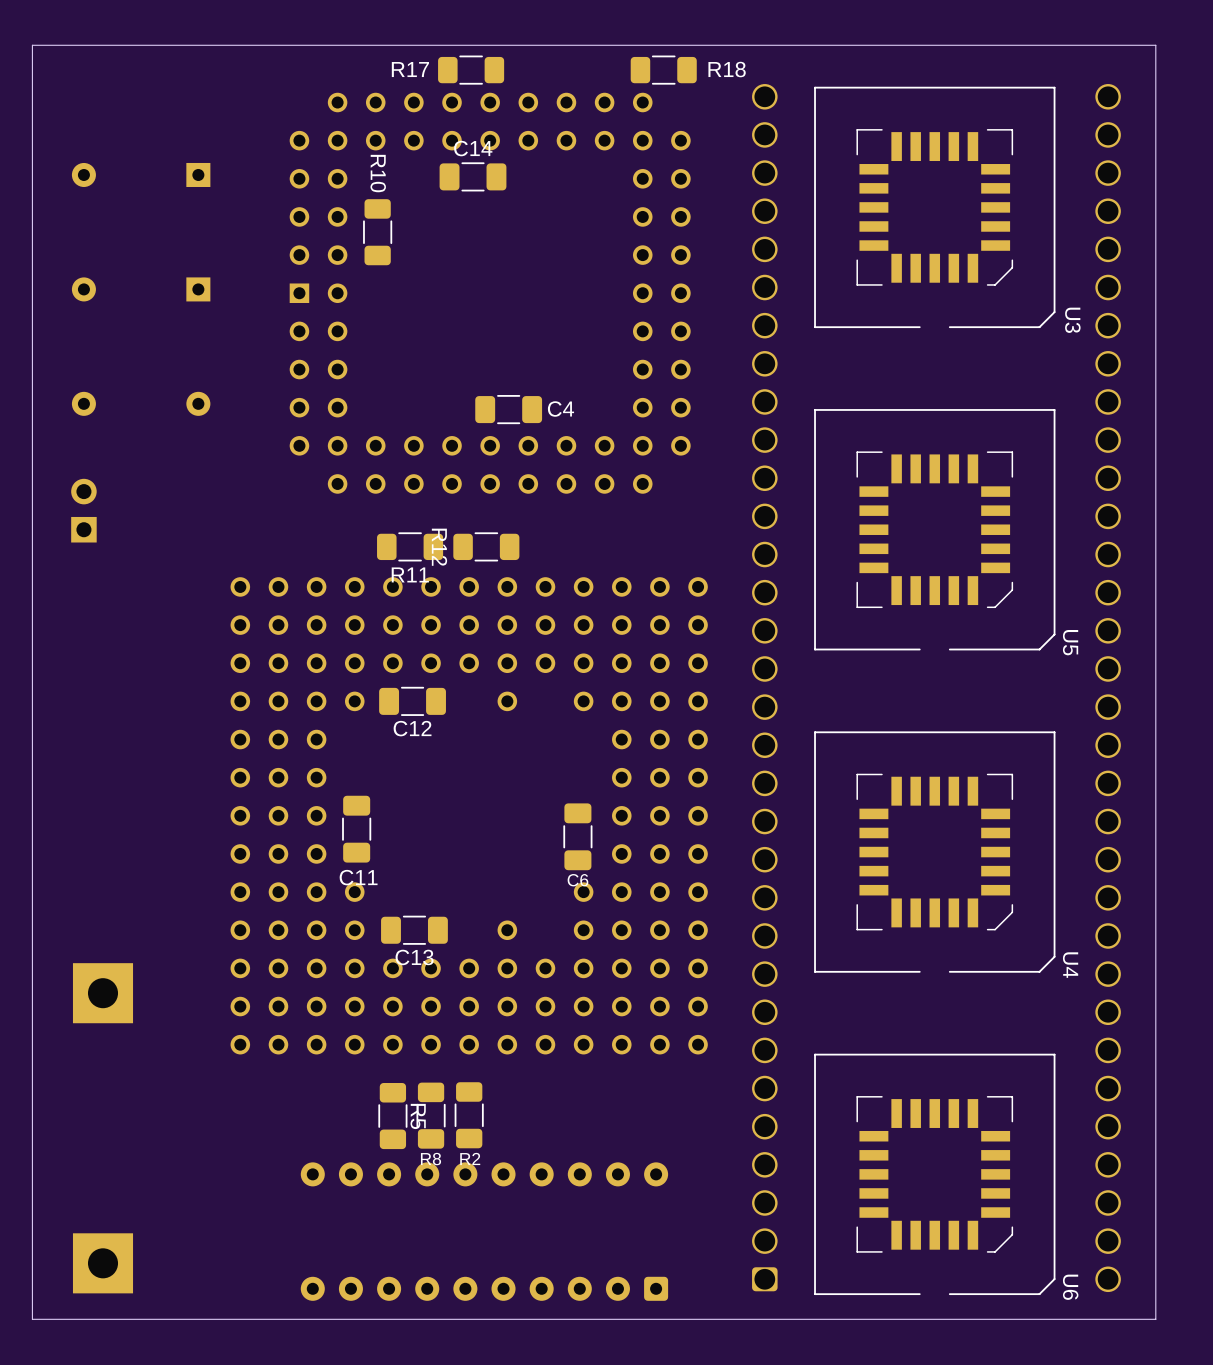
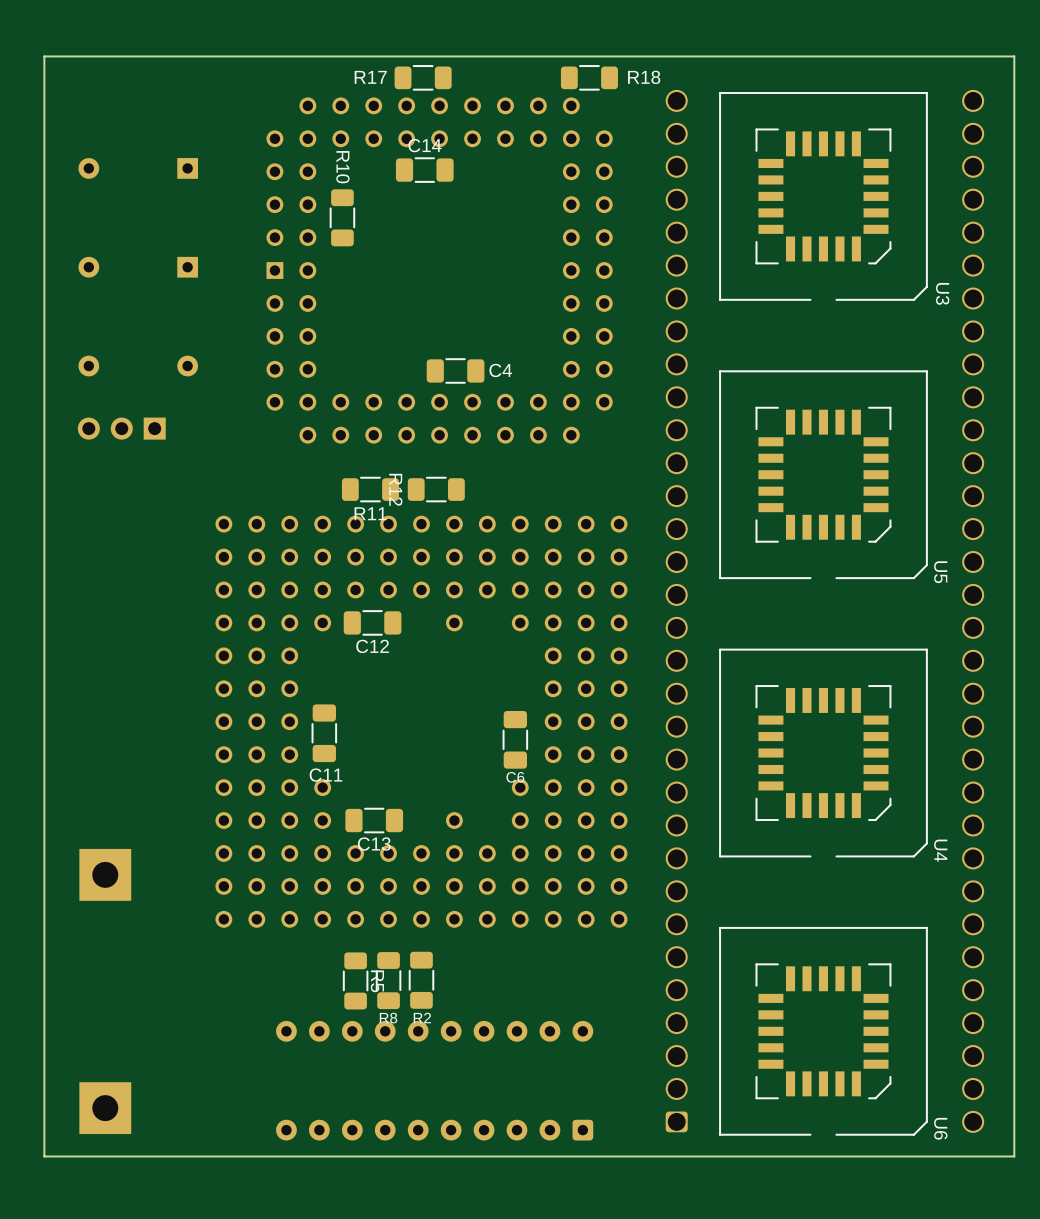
part: none -> (121, 428)
part: (83, 510) -> none

